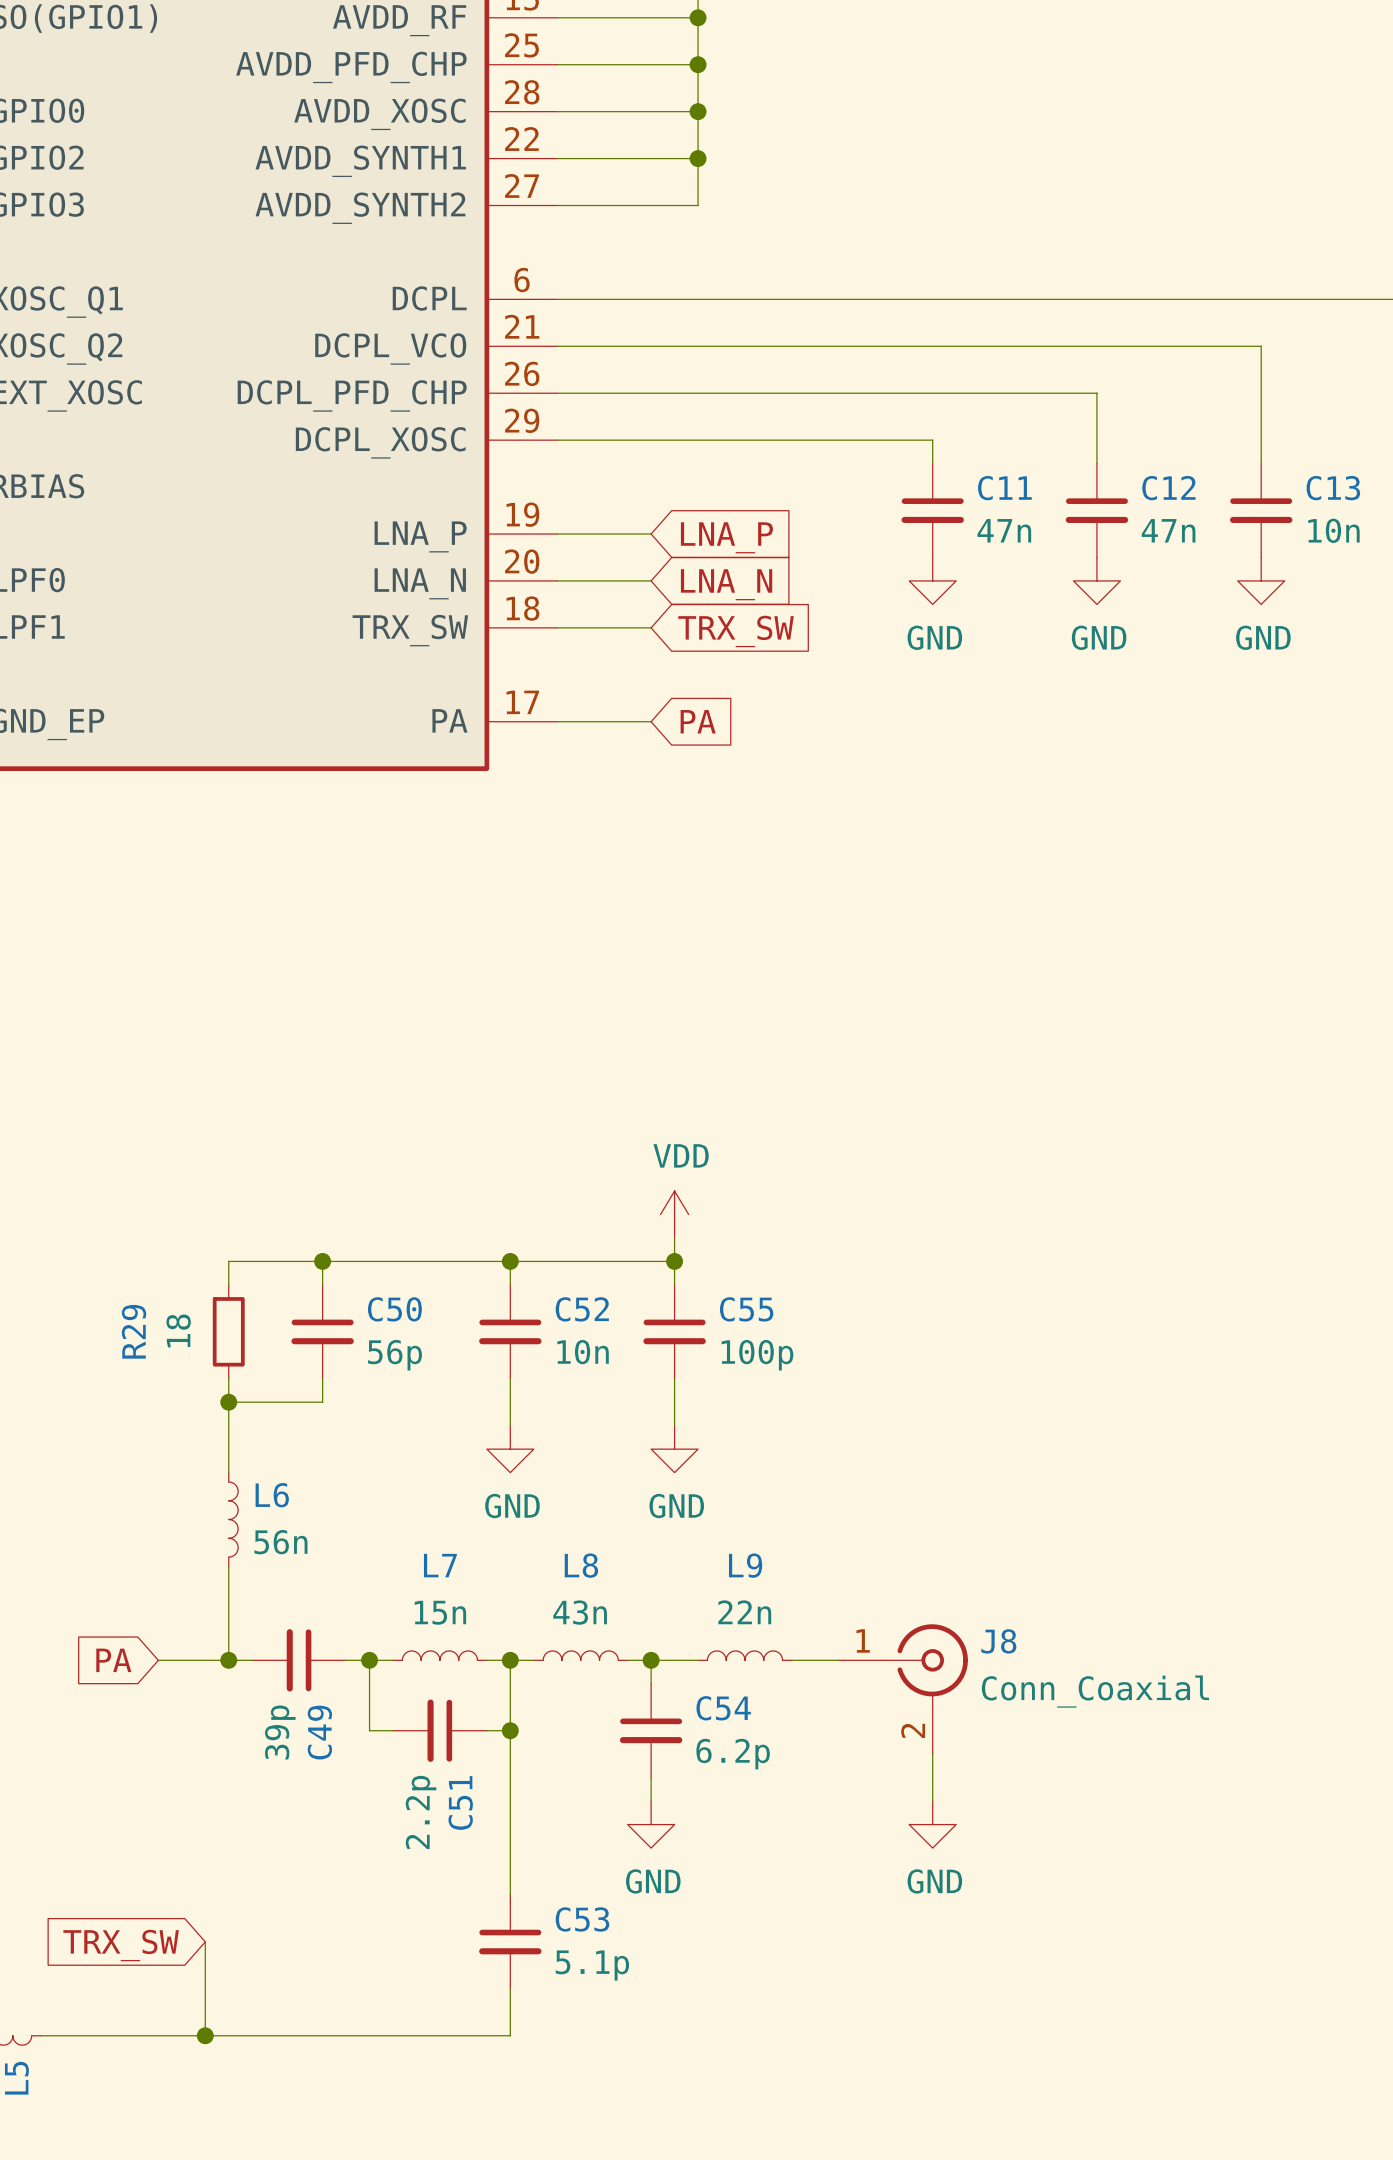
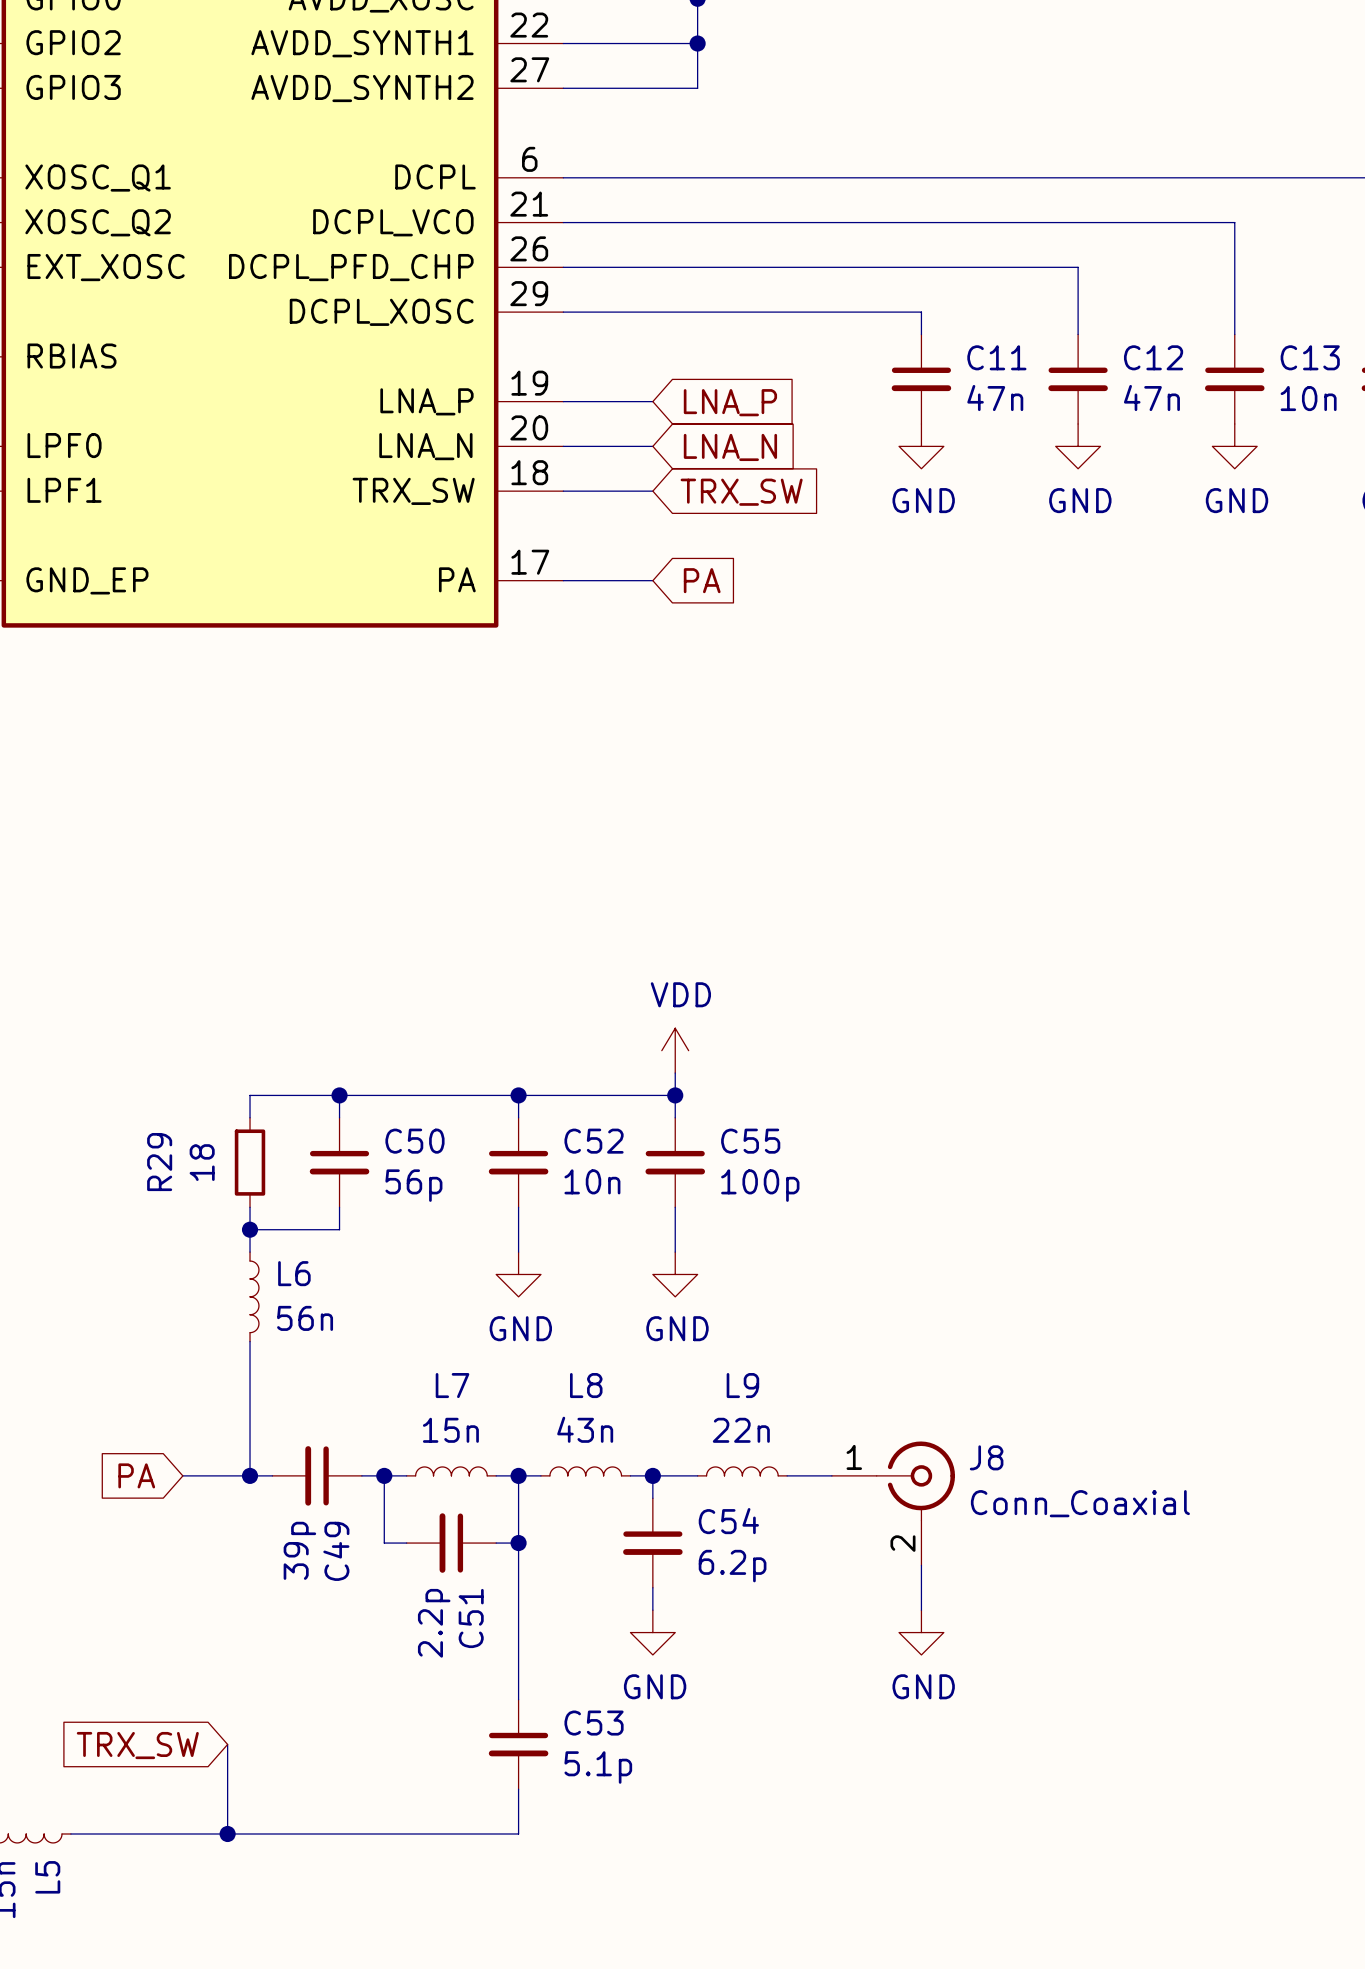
wire: (228, 1425) (228, 1472) -> (250, 1341) (250, 1386)
L6 position: (233, 1519) -> (254, 1296)

